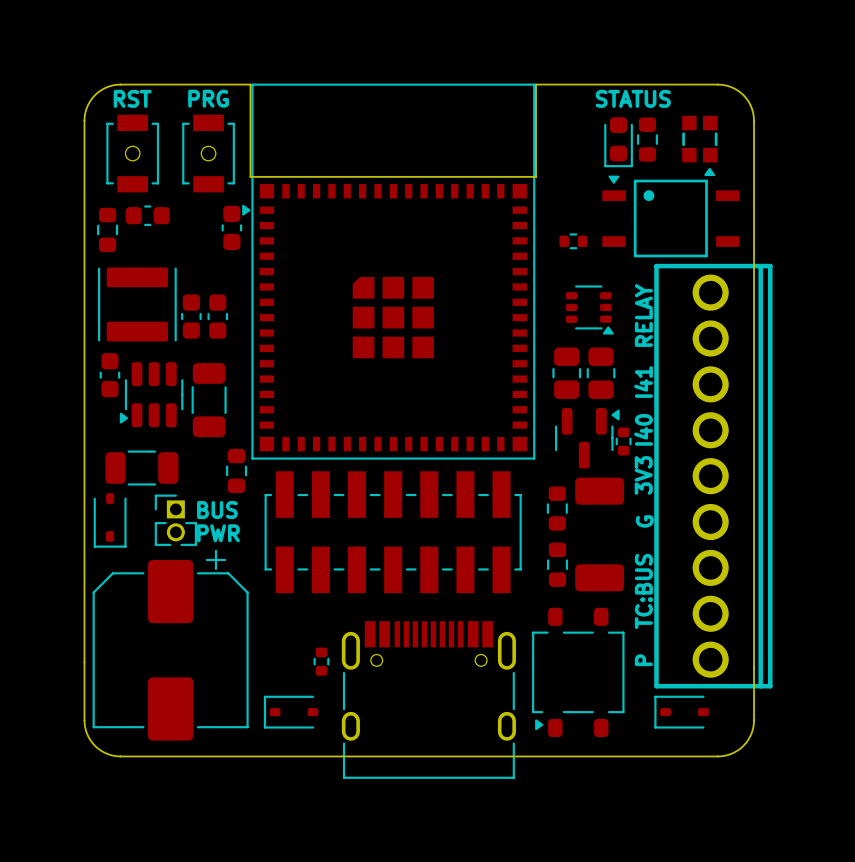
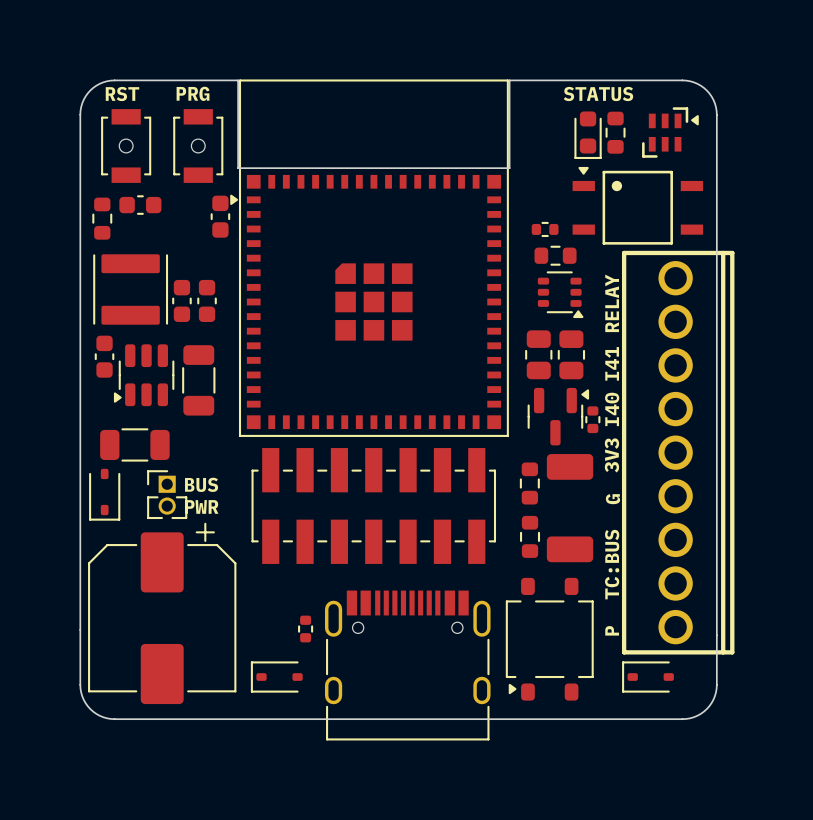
part footprint: [682, 115, 718, 177] -> [642, 107, 699, 158]
part rotation: 0° (236, 470) -> 90° clockwise (555, 255)
part position: (236, 470) -> (555, 255)

